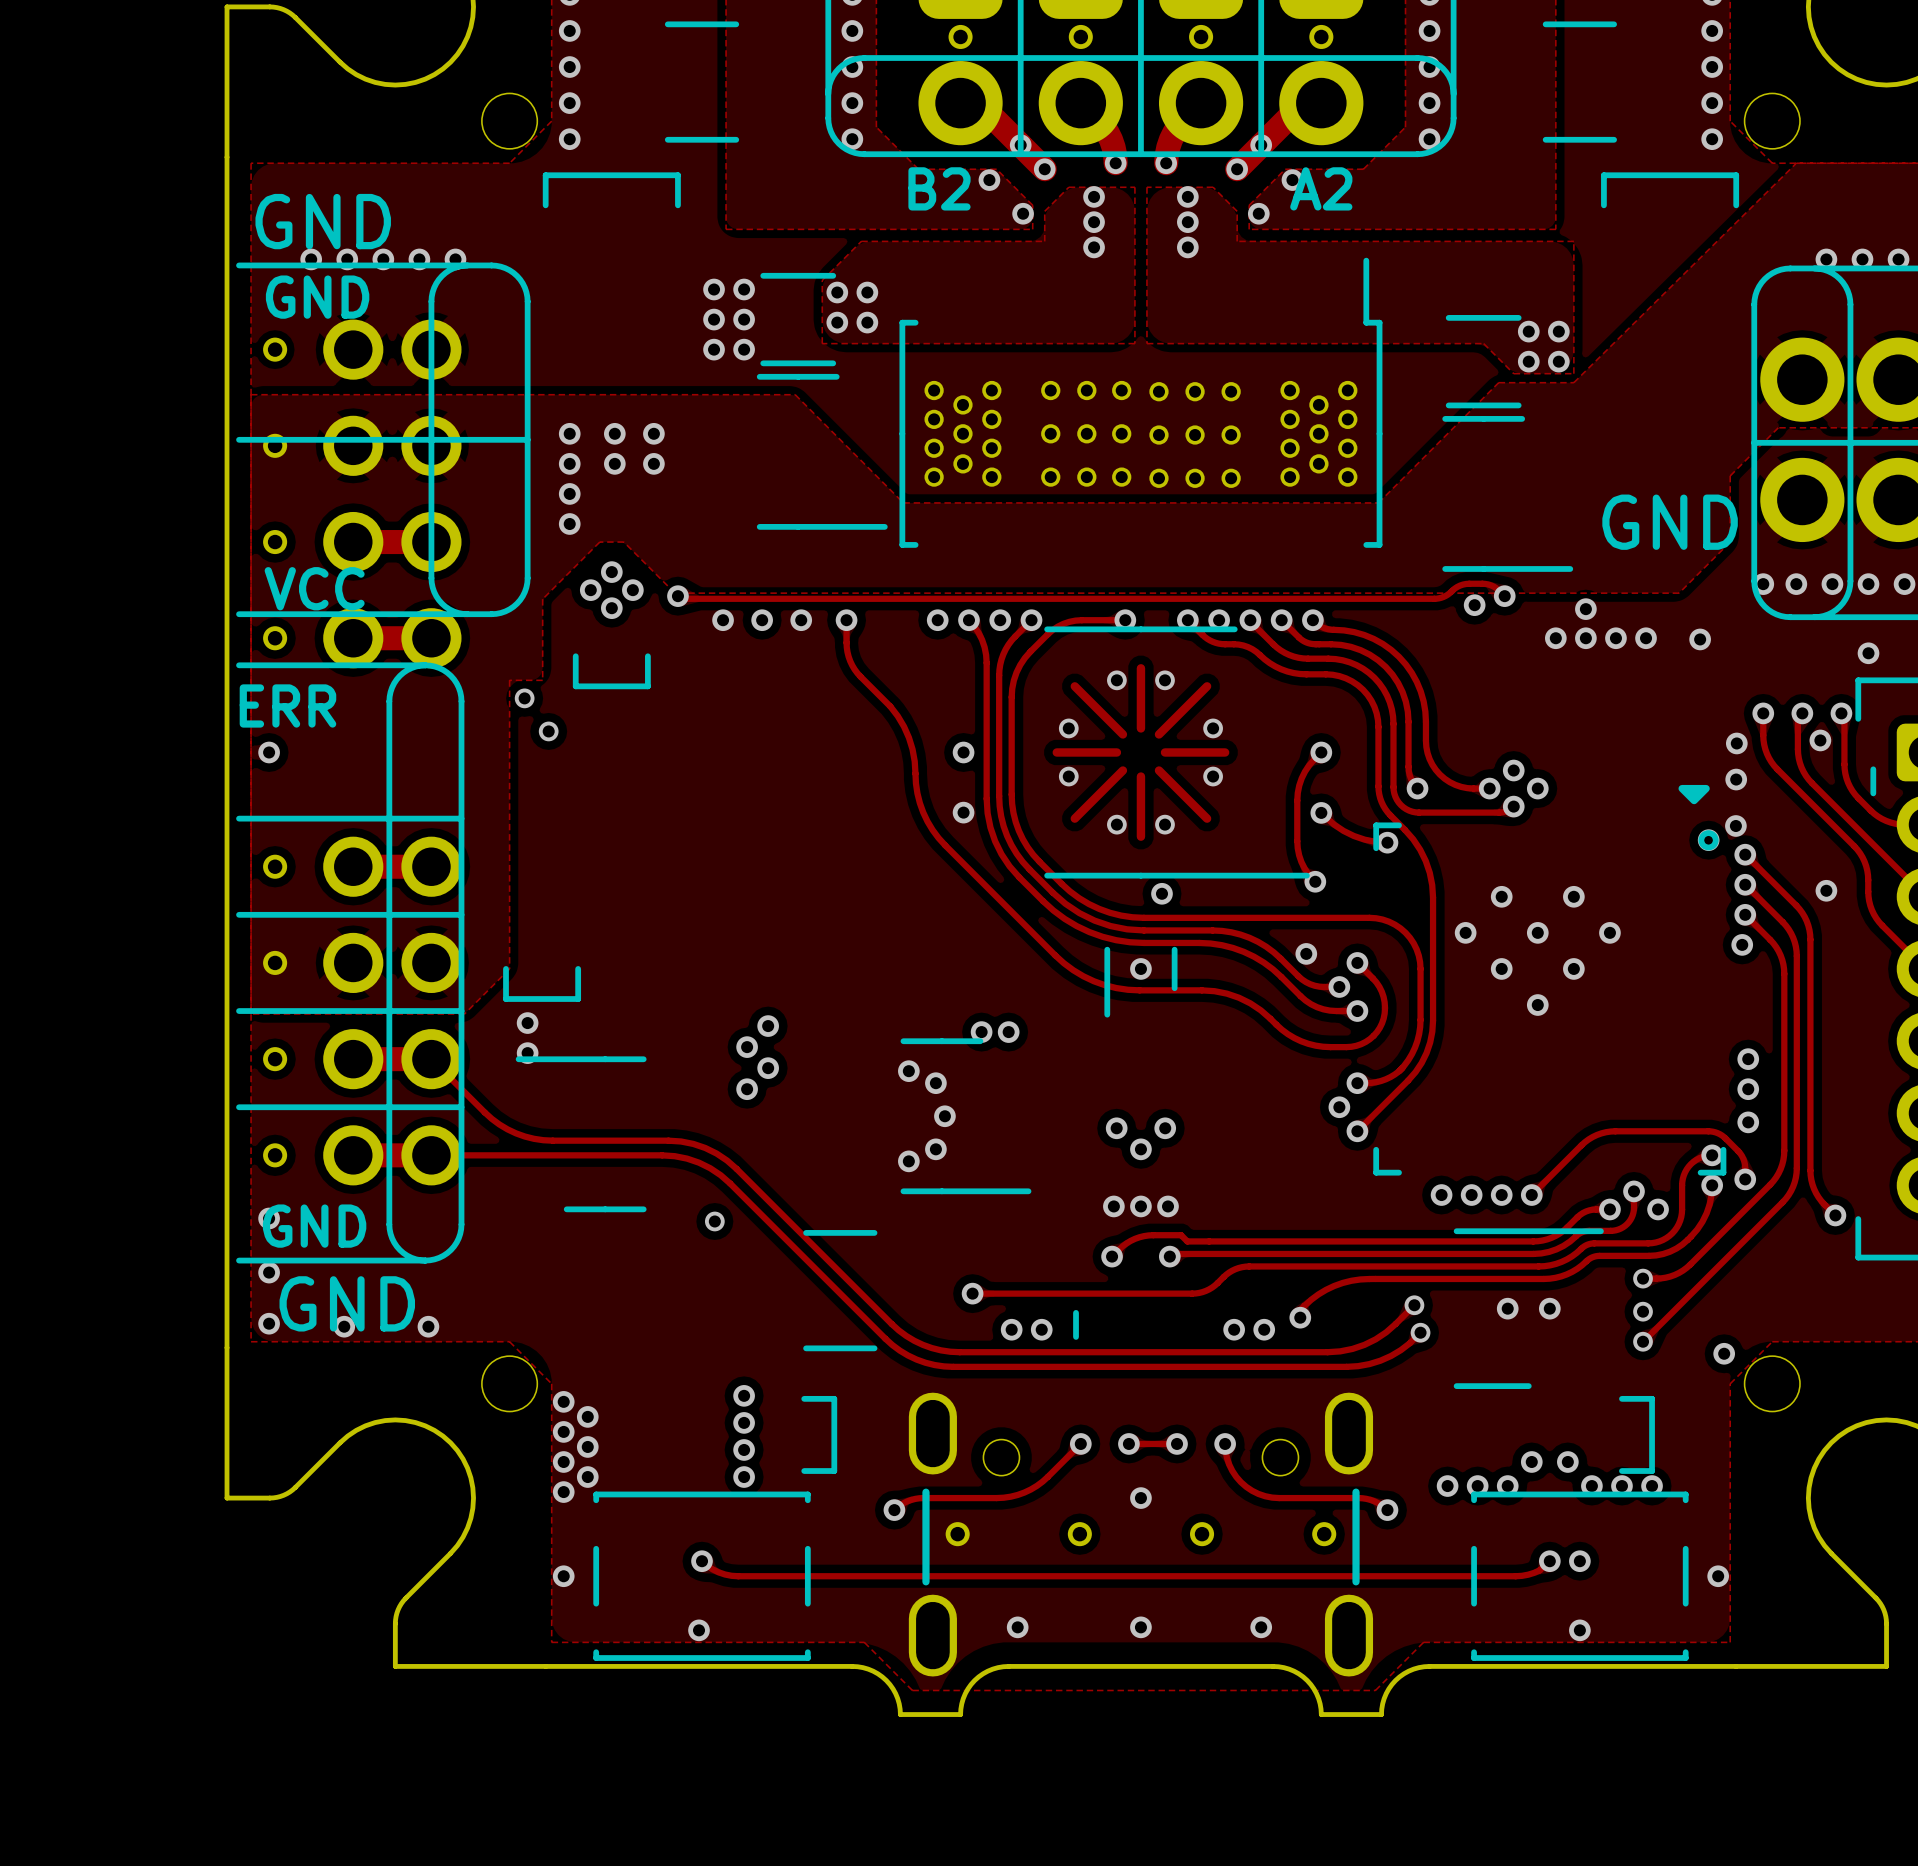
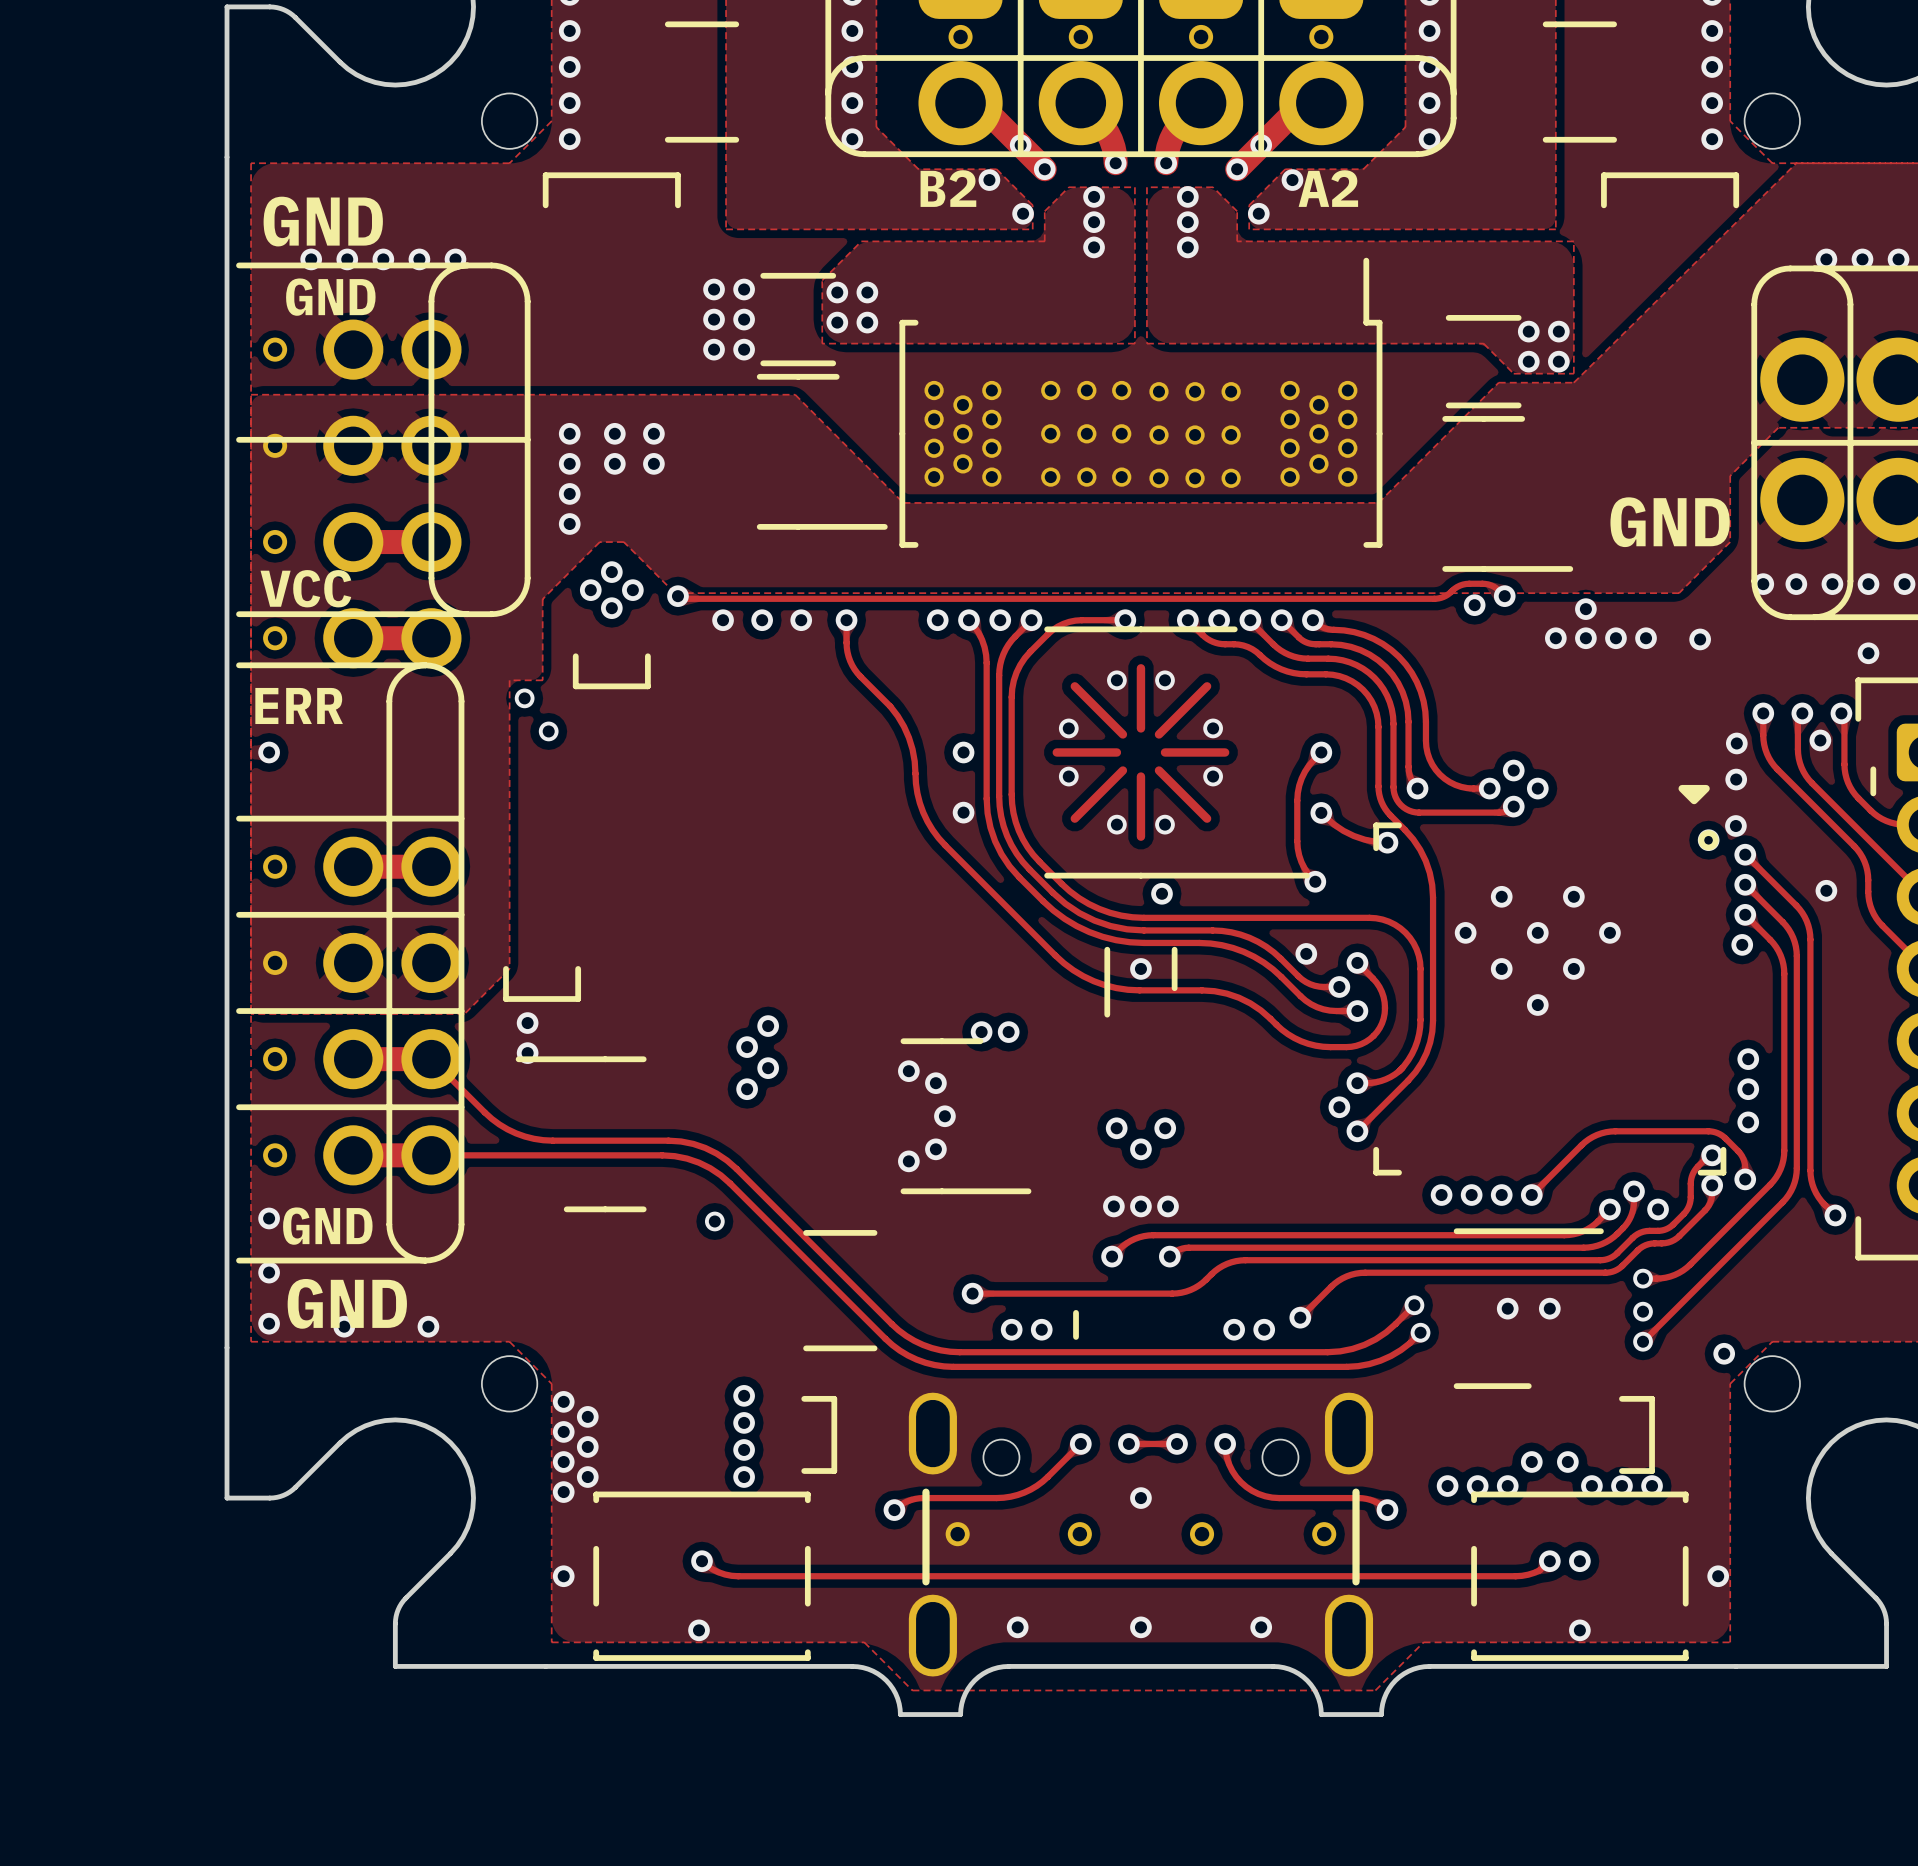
track: (1712, 1155) (1696, 1159) (1686, 1169) (1682, 1182) (1681, 1213) (1678, 1224) (1669, 1235) (1655, 1242) (1590, 1243) (1567, 1259) (1544, 1266) (1245, 1266) (1229, 1272) (1205, 1290) (1195, 1293) (1172, 1293) -> (1712, 1155) (1709, 1155) (1693, 1172) (1688, 1206) (1673, 1224) (1664, 1229) (1646, 1231) (1637, 1234) (1615, 1254) (1607, 1259) (1240, 1260) (1218, 1268) (1194, 1287) (1172, 1293)
track: (1712, 1185) (1709, 1204) (1697, 1229) (1682, 1244) (1663, 1254) (1595, 1256) (1572, 1271) (1549, 1278) (1372, 1278) (1351, 1280) (1334, 1285) (1318, 1294) (1300, 1310) (1300, 1317) -> (1712, 1185) (1711, 1199) (1707, 1207) (1676, 1238) (1668, 1242) (1651, 1243) (1642, 1246) (1620, 1267) (1612, 1271) (1360, 1272) (1346, 1276) (1334, 1283) (1300, 1317)
track: (1633, 1201) (1631, 1217) (1623, 1227) (1613, 1230) (1583, 1231) (1563, 1245) (1541, 1253) (1176, 1253) (1169, 1256) -> (1633, 1201) (1631, 1216) (1622, 1228) (1606, 1242) (1588, 1247) (1188, 1247) (1179, 1249) (1169, 1256)
track: (1609, 1209) (1586, 1211) (1560, 1233) (1537, 1241) (1187, 1241) (1181, 1235) -> (1609, 1209) (1591, 1227) (1568, 1234) (1181, 1235)

